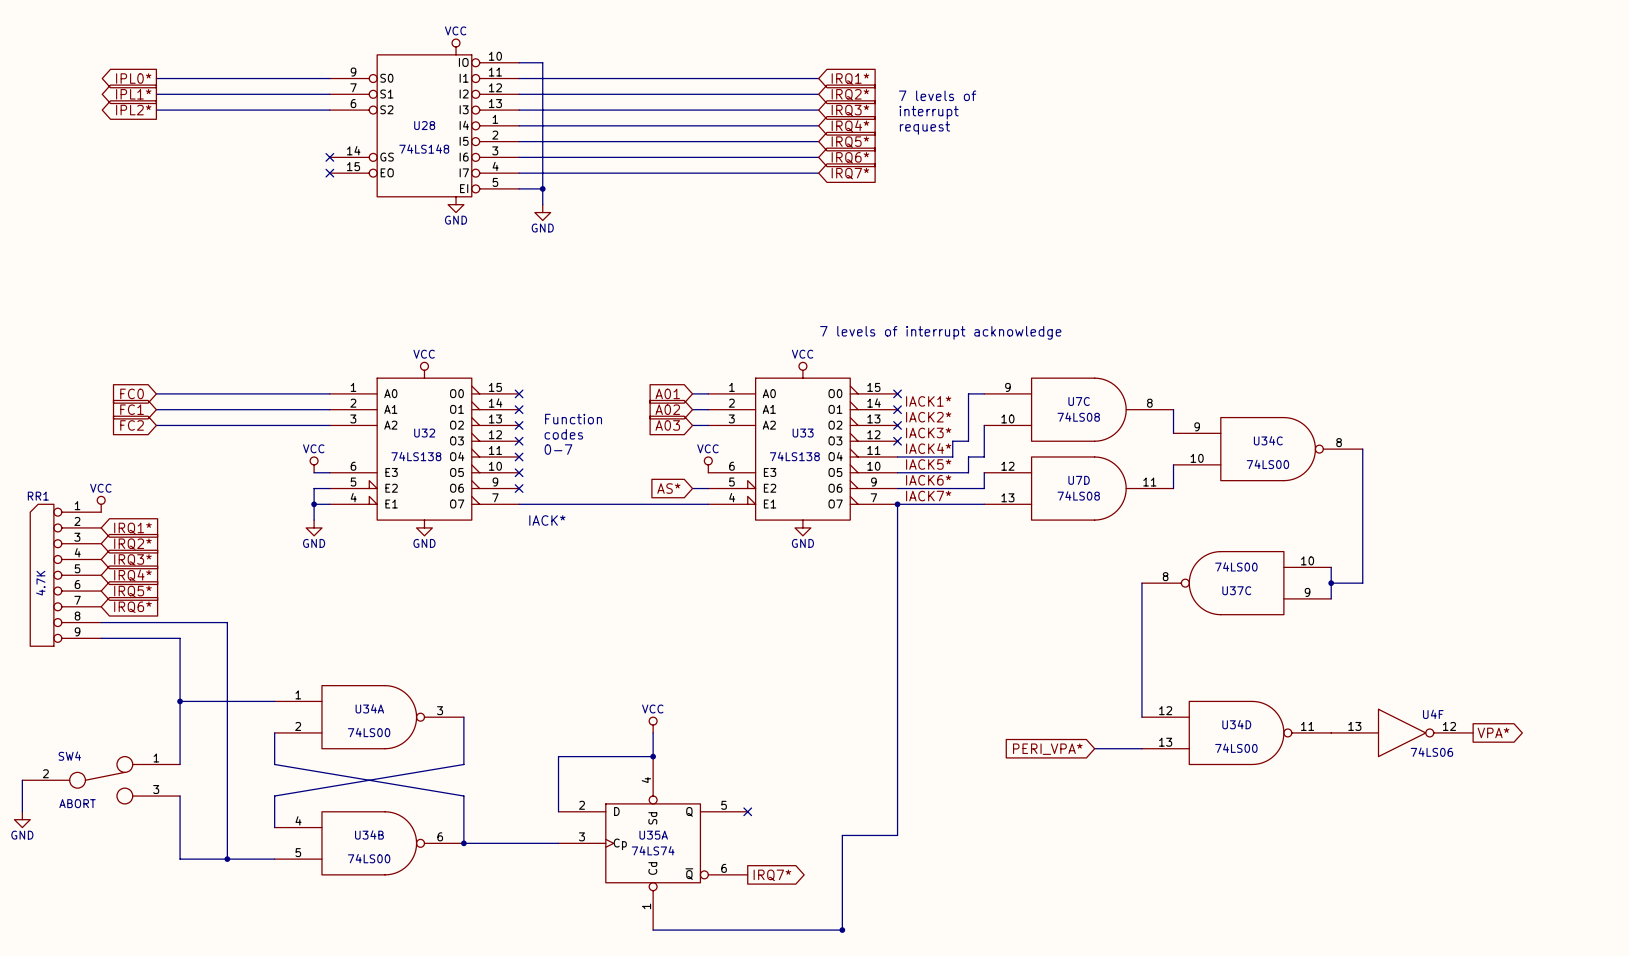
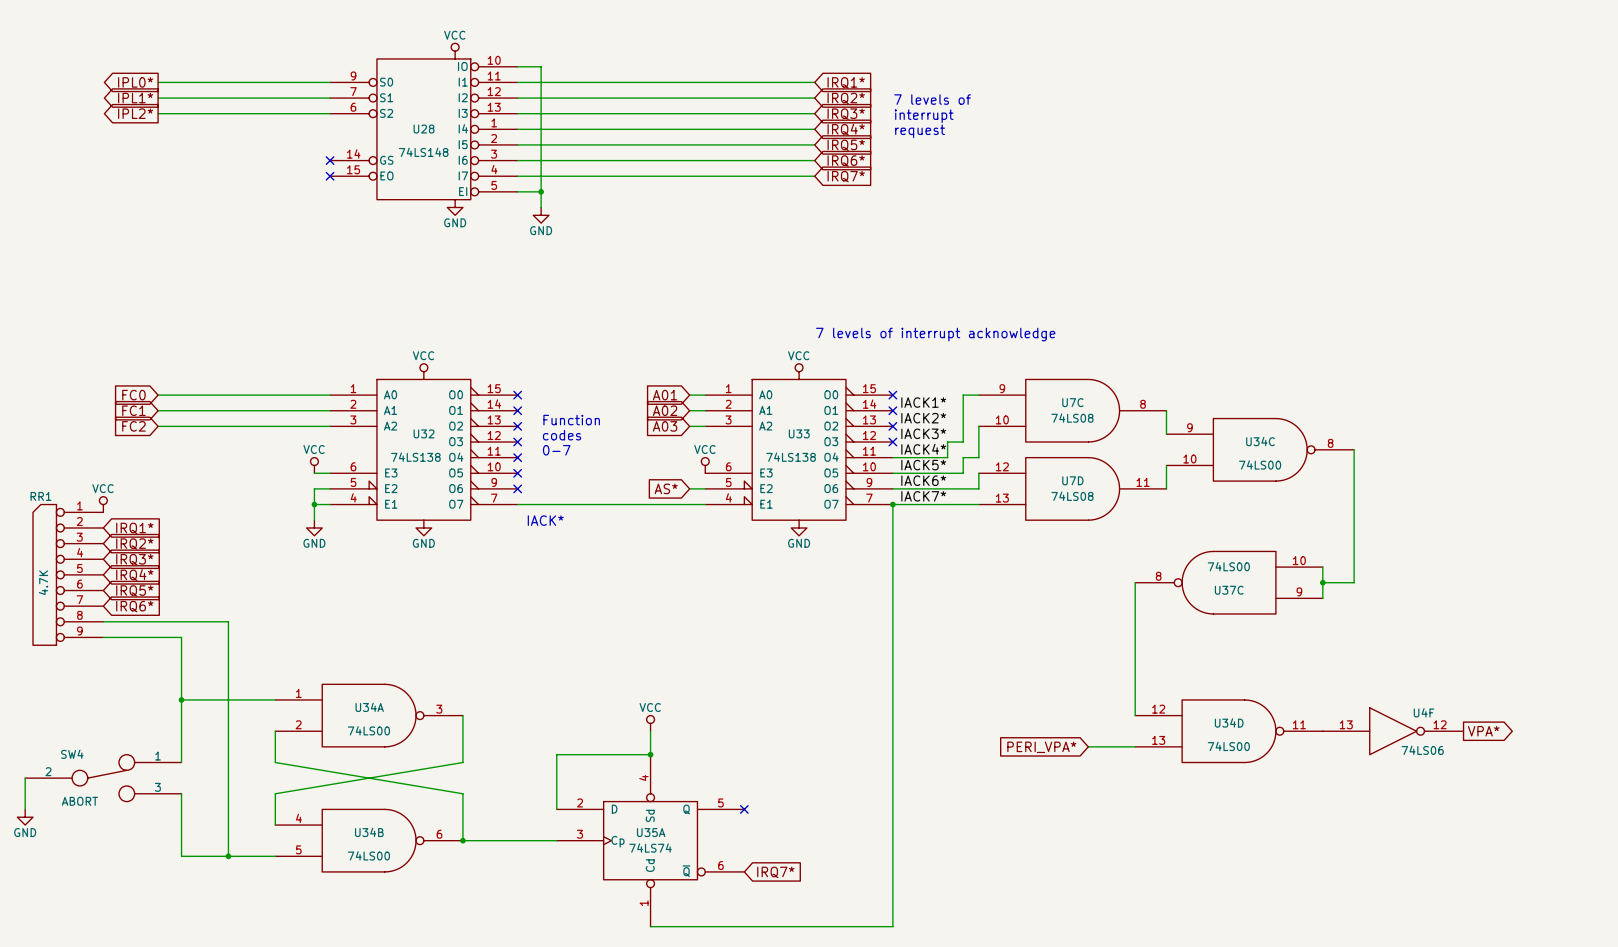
wire: (897, 835) (842, 835) (842, 930) -> (892, 832) (892, 926) (838, 926)
global label shape: output (772, 875) -> input (775, 872)
junction: (842, 930) -> none

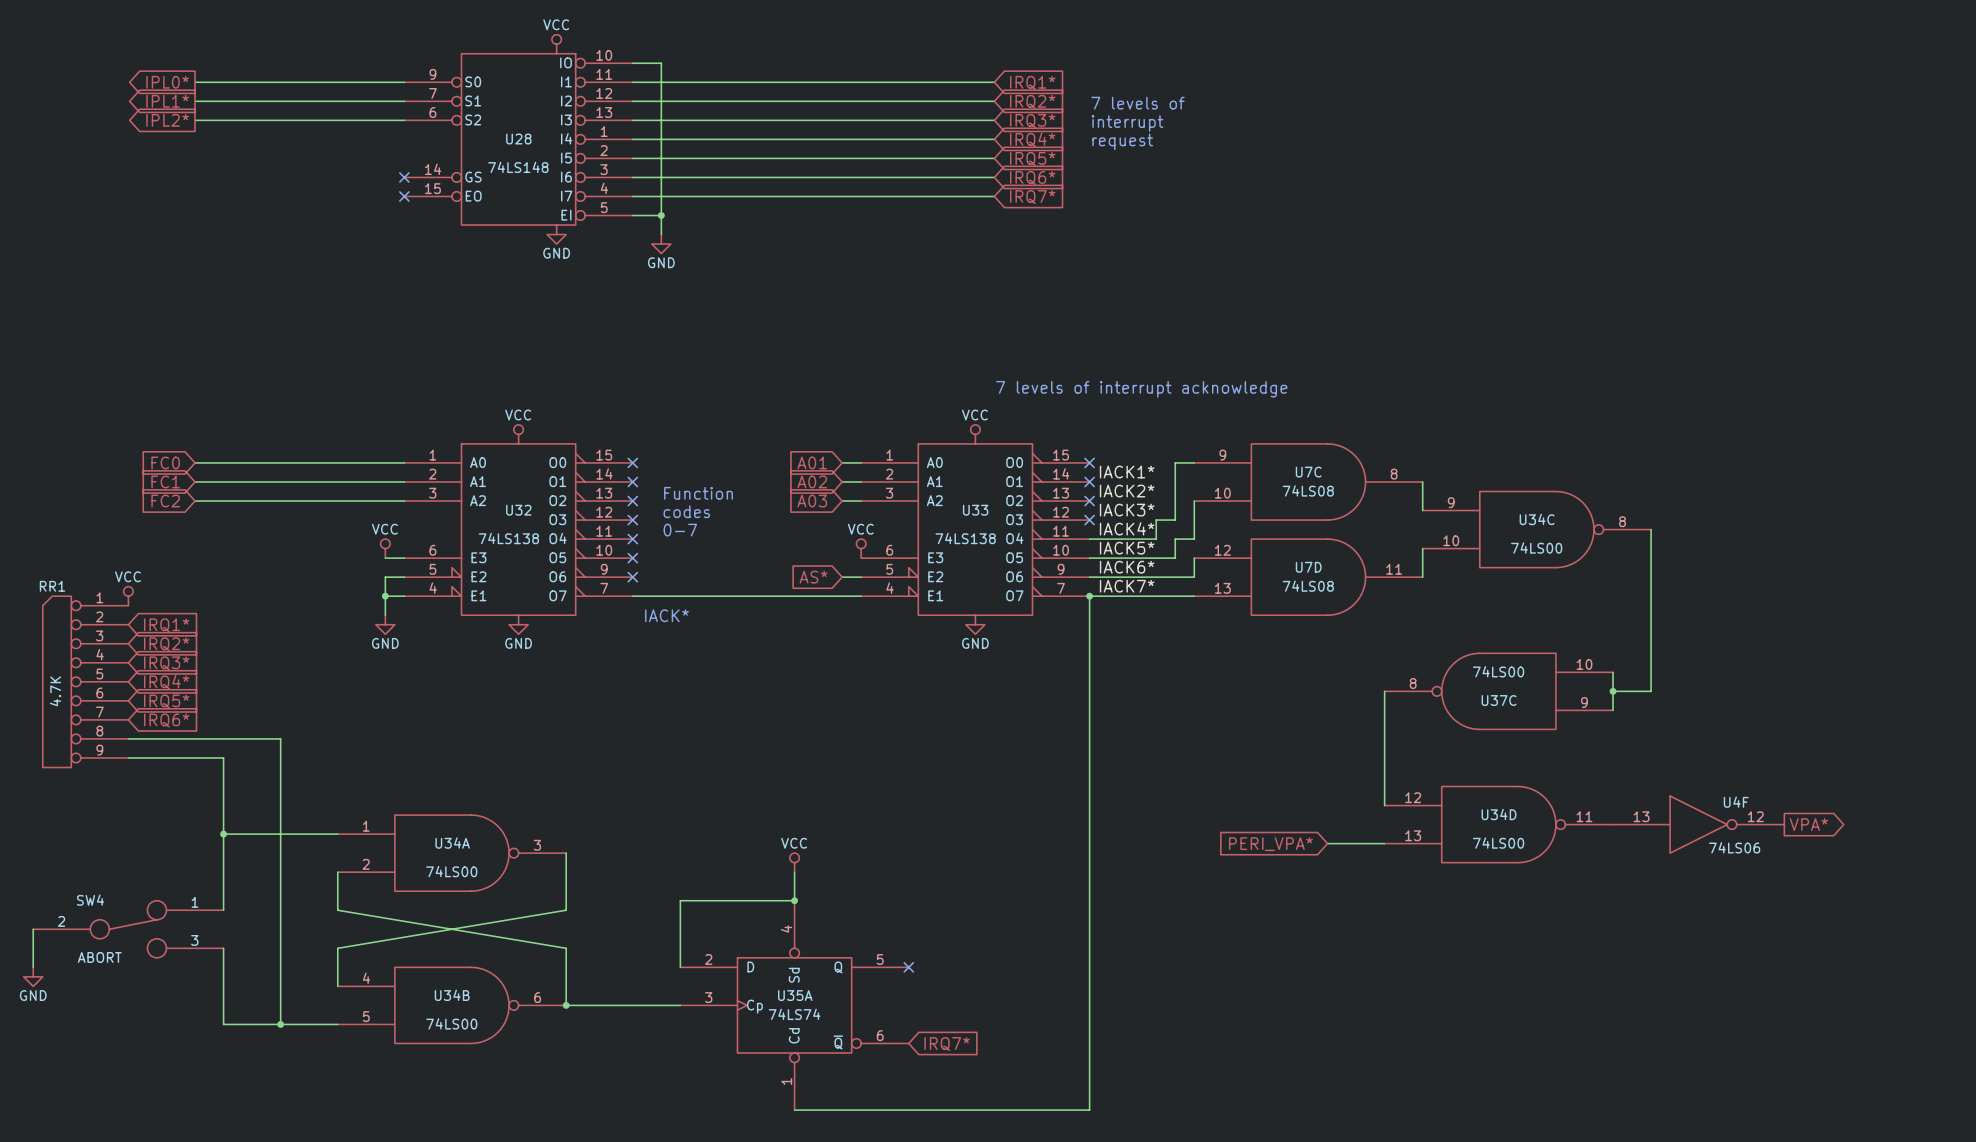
wire: (1135, 676) (1135, 715) -> none
U34D position: (1229, 731) -> (1498, 824)
U4F position: (1393, 731) -> (1698, 824)
global label position: VPA* (1483, 731) -> VPA* (1808, 824)
wire: (1088, 746) (1135, 746) -> (1327, 843) (1384, 843)
global label position: PERI_VPA* (1041, 747) -> PERI_VPA* (1270, 844)

